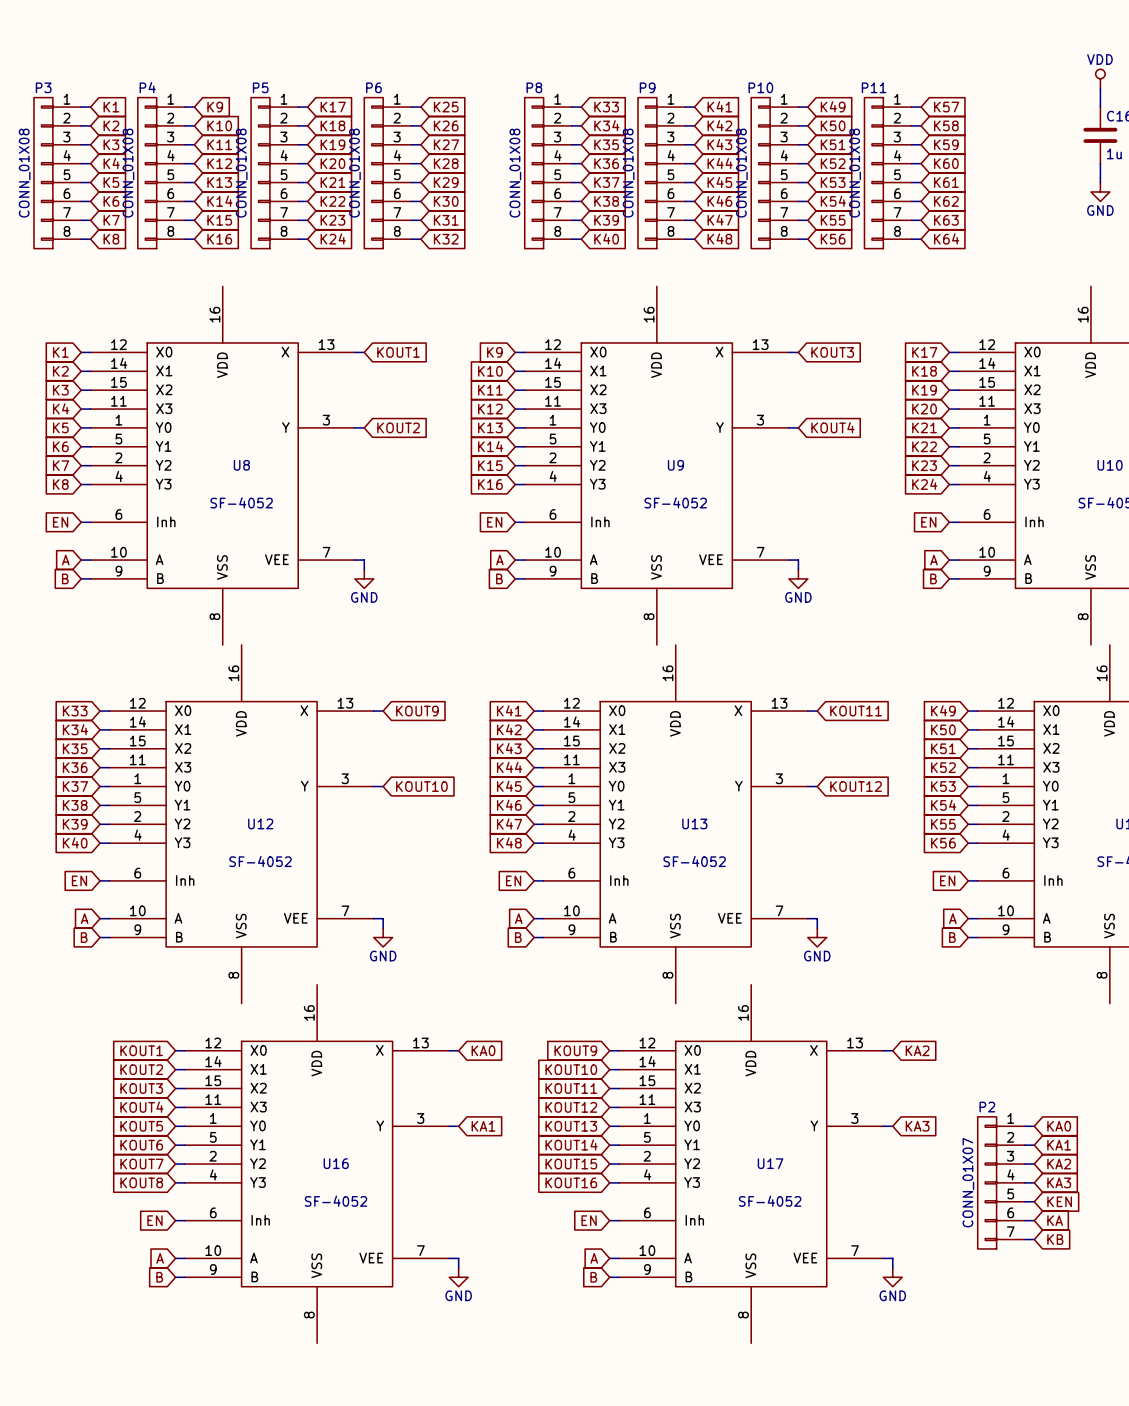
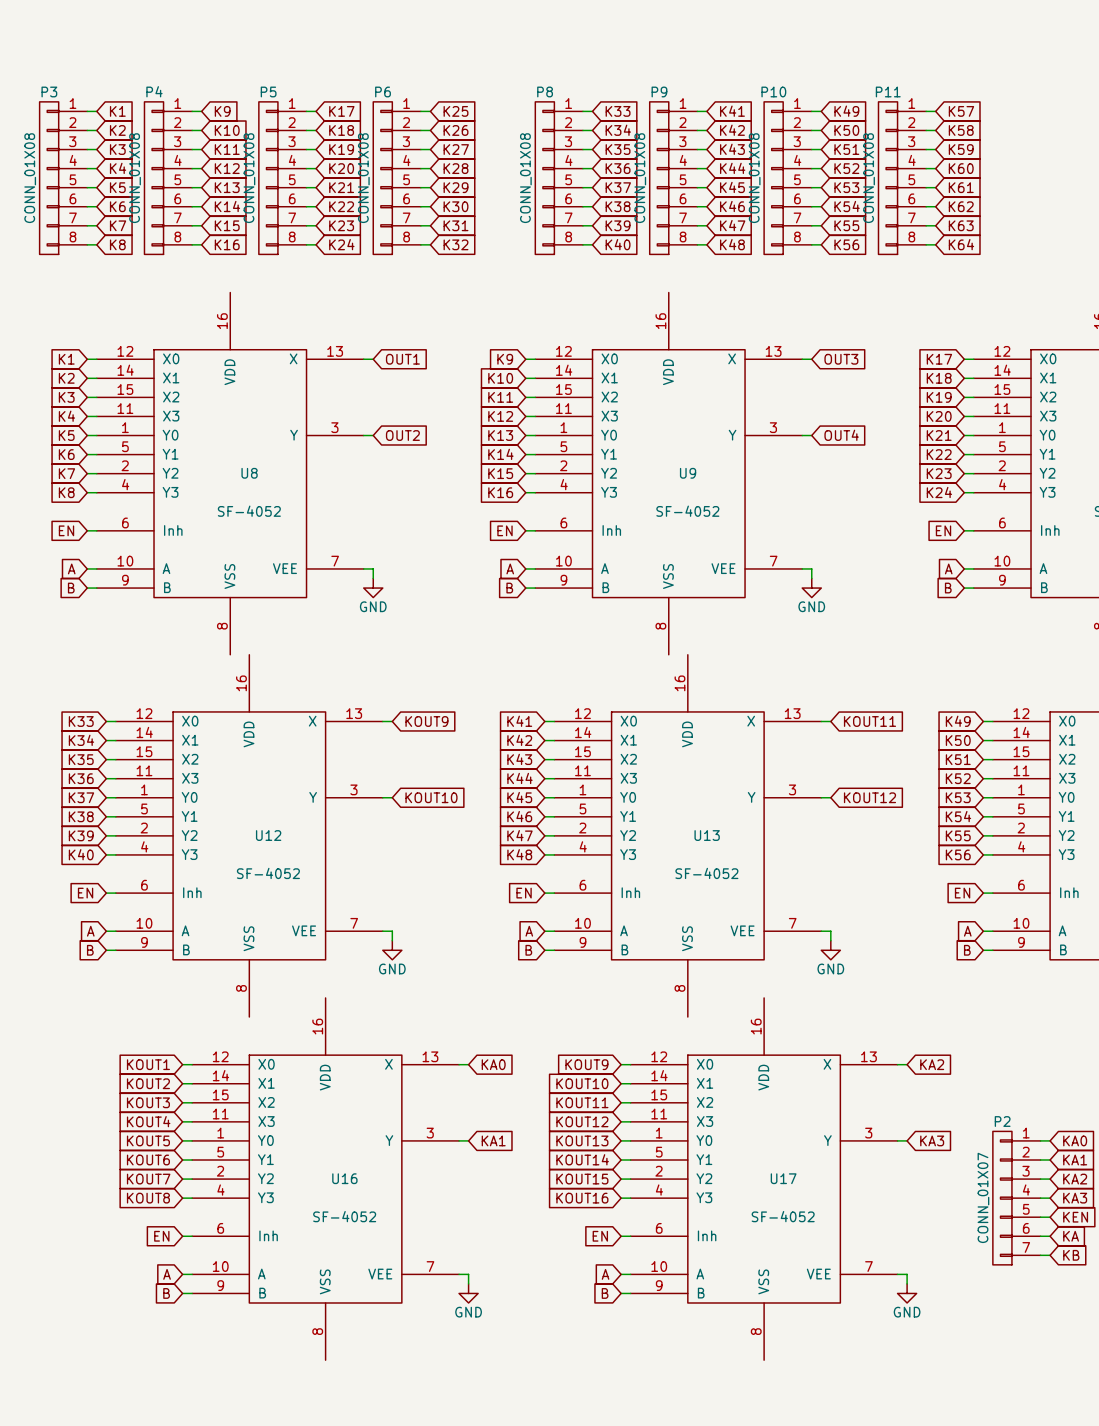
global label: KOUT1 (398, 352) -> OUT1 (402, 359)
global label: KOUT3 (832, 352) -> OUT3 (841, 359)
global label: KOUT2 (398, 427) -> OUT2 (402, 435)
global label: KOUT4 (832, 427) -> OUT4 (841, 435)

